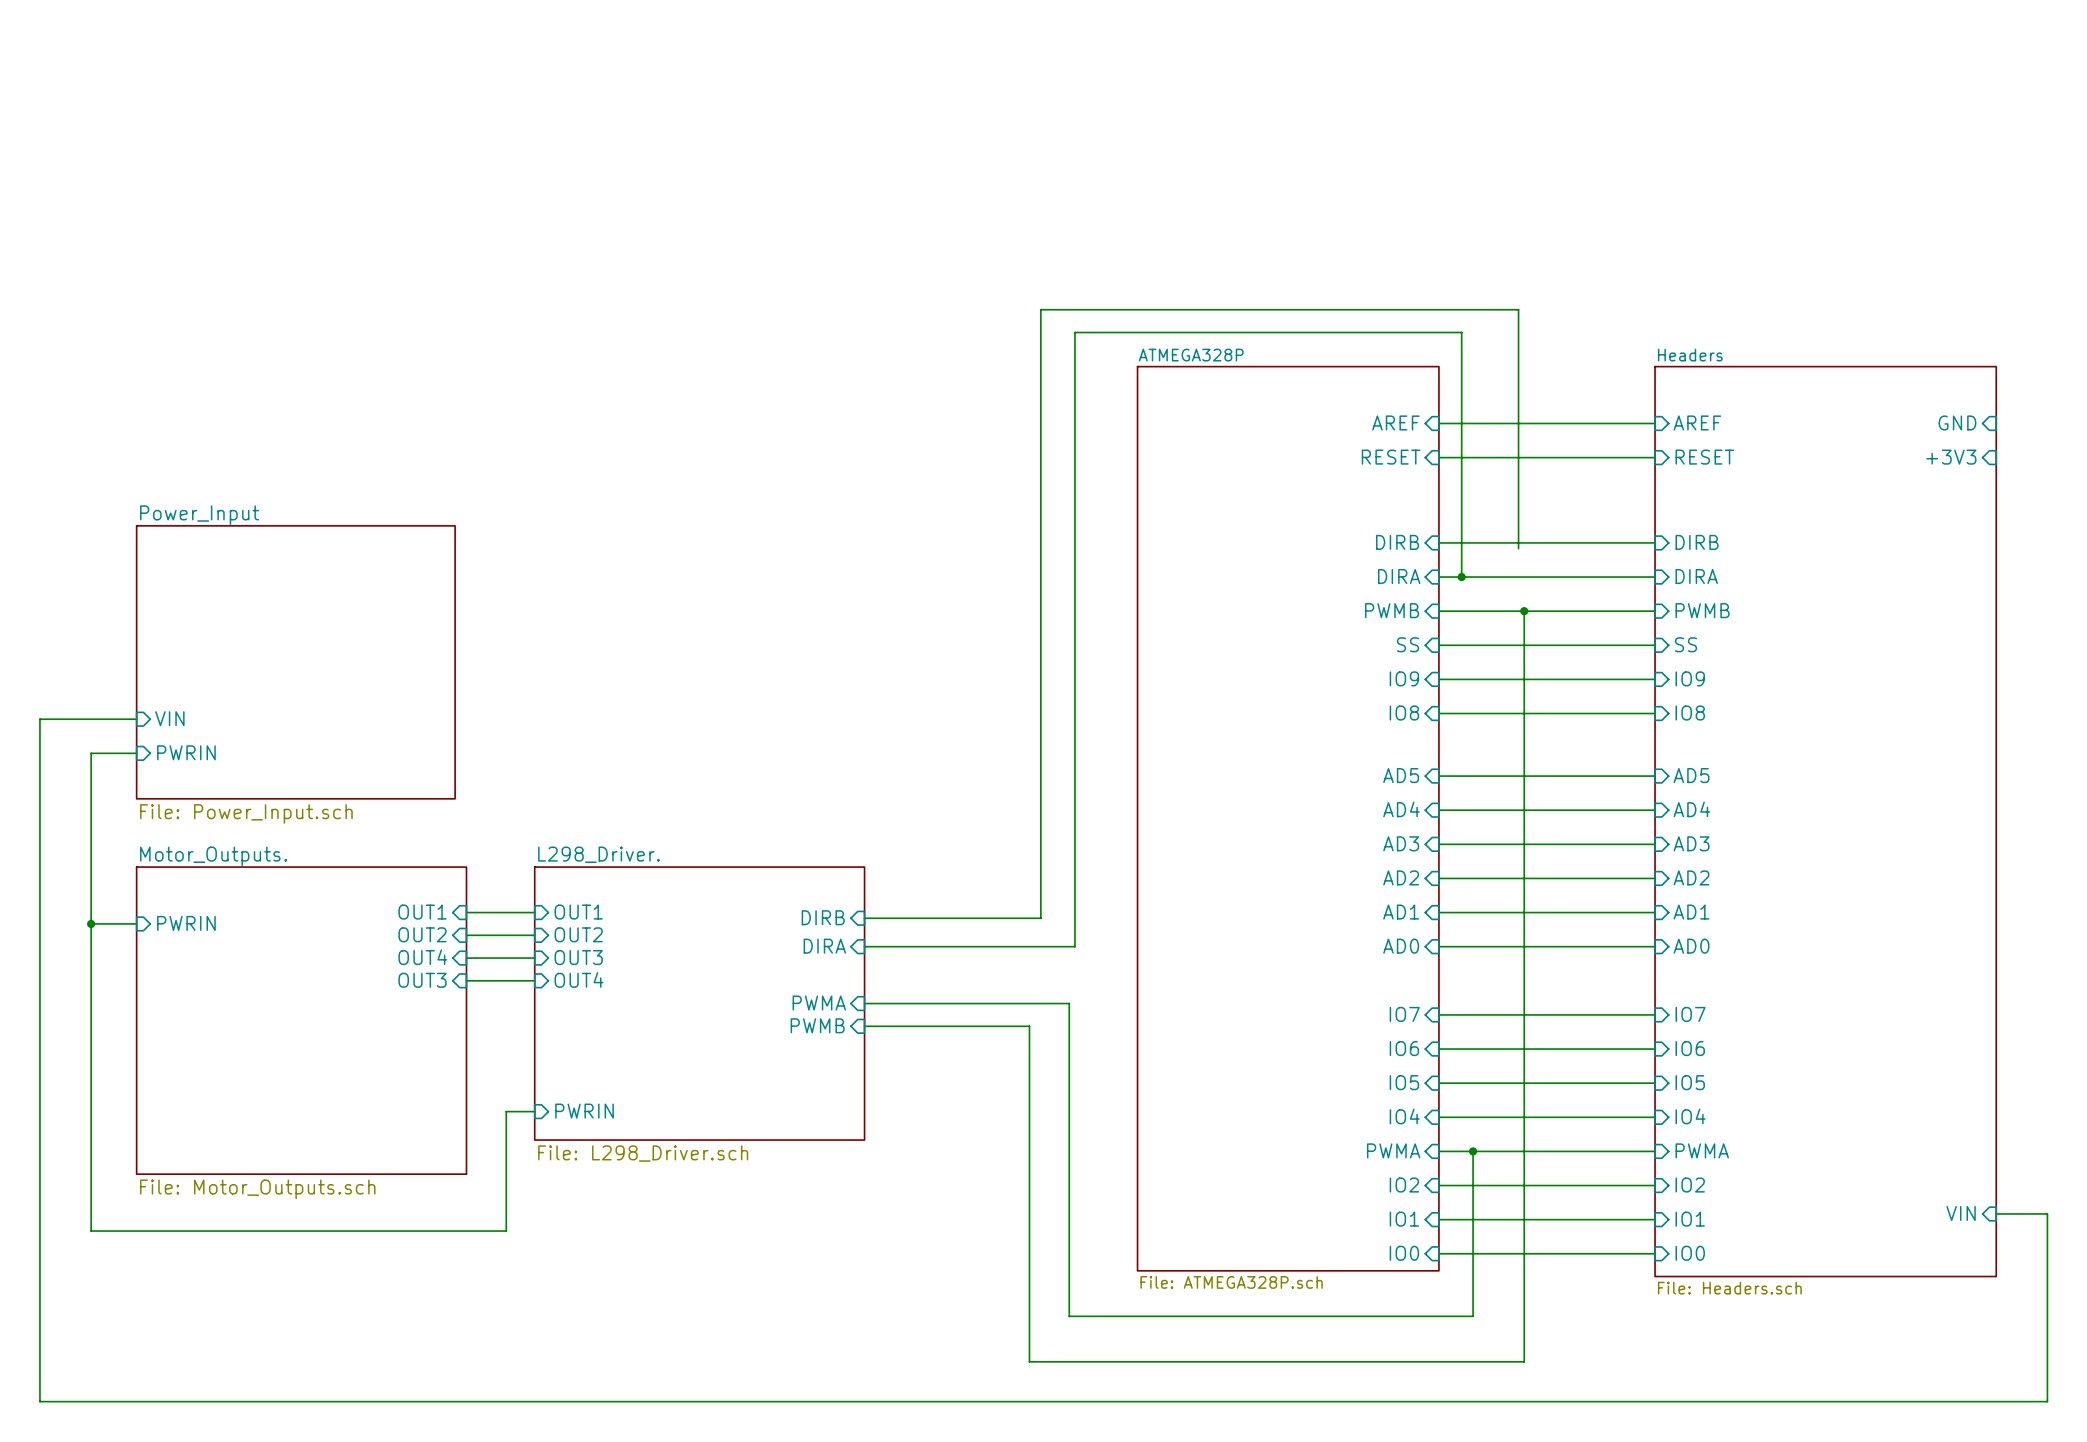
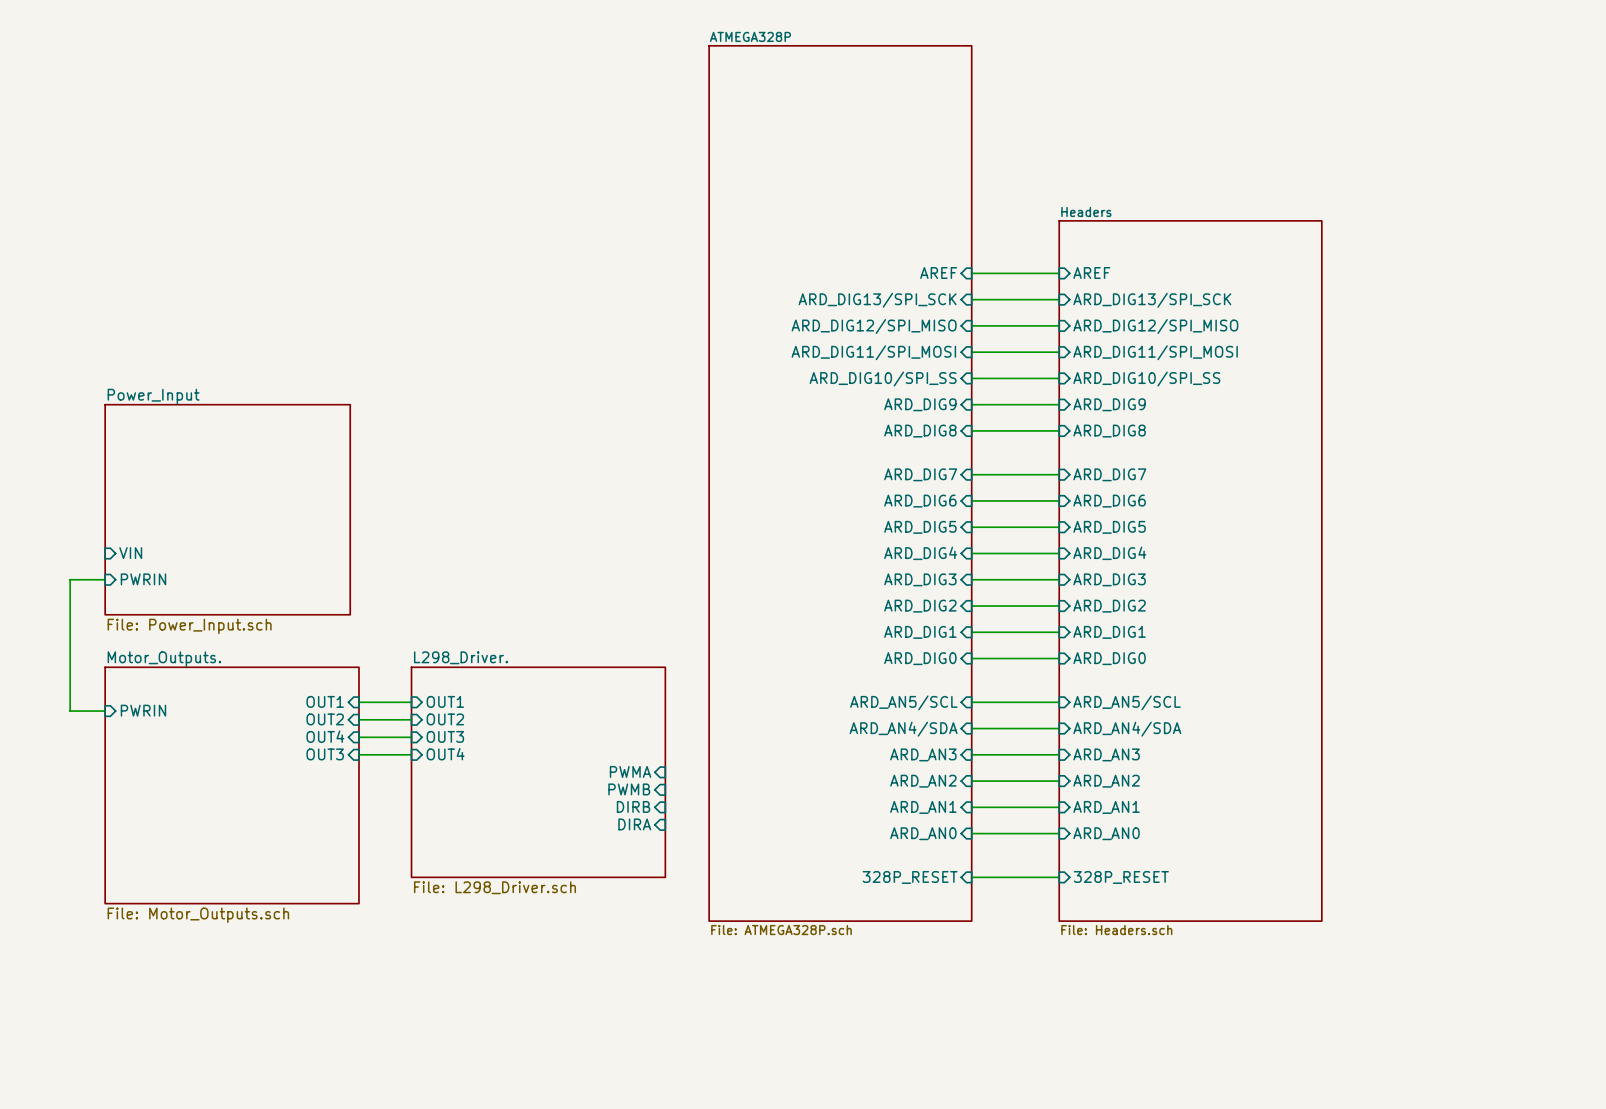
sheet pin: none -> AREF (938, 273)
sheet ATMEGA328P name position: ATMEGA328P (1191, 355) -> ATMEGA328P (750, 36)
wire: none -> (971, 273) (1059, 273)
sheet ATMEGA328P shape: [1137, 366, 1439, 1271] -> [709, 45, 972, 922]
wire: none -> (971, 299) (1059, 299)
sheet pin: none -> ARD_DIG13/SPI_SCK (877, 300)
sheet pin: none -> ARD_DIG13/SPI_SCK (1152, 300)
sheet pin rotation: 0° (1395, 422) -> 180° (1091, 273)
sheet pin position: AREF (1395, 422) -> AREF (1091, 273)
sheet pin: AREF (1697, 422) -> none
sheet pin: GND (1957, 422) -> none
wire: none -> (971, 325) (1059, 325)
wire: (1438, 423) (1655, 423) -> none
sheet pin: none -> ARD_DIG12/SPI_MISO (874, 326)
sheet pin: none -> ARD_DIG12/SPI_MISO (1155, 326)
wire: none -> (971, 352) (1059, 352)
sheet pin: RESET (1391, 457) -> none
wire: (1438, 457) (1655, 457) -> none
sheet pin: RESET (1704, 457) -> none
sheet pin: +3V3 (1951, 457) -> none
sheet pin: none -> ARD_DIG11/SPI_MOSI (873, 352)
sheet pin: none -> ARD_DIG11/SPI_MOSI (1155, 352)
wire: none -> (971, 378) (1059, 378)
sheet pin: none -> ARD_DIG10/SPI_SS (883, 379)
sheet pin: none -> ARD_DIG10/SPI_SS (1146, 379)
wire: none -> (971, 404) (1059, 404)
sheet pin: none -> ARD_DIG9 (920, 404)
sheet pin: none -> ARD_DIG9 (1109, 404)
sheet pin: DIRB (1397, 542) -> none
wire: (1438, 542) (1655, 542) -> none
sheet pin: DIRB (1697, 542) -> none
wire: (1518, 548) (1518, 309) (1040, 309) (1040, 918) (864, 918) -> none
wire: none -> (971, 430) (1059, 430)
sheet pin: none -> ARD_DIG8 (920, 431)
sheet pin: none -> ARD_DIG8 (1109, 431)
sheet pin: DIRA (1399, 576) -> none
sheet pin: DIRA (1696, 576) -> none
wire: (1438, 577) (1655, 577) -> none
wire: (1461, 577) (1461, 332) (1074, 332) (1074, 946) (864, 946) -> none
junction: (1461, 577) -> none
sheet pin: PWMB (1392, 610) -> none
sheet pin: PWMB (1702, 610) -> none
wire: (1438, 611) (1655, 611) -> none
wire: (1524, 611) (1524, 1361) (1029, 1361) (1029, 1026) (864, 1026) -> none
junction: (1524, 611) -> none
sheet pin: none -> ARD_DIG7 (920, 474)
wire: none -> (971, 474) (1059, 474)
sheet pin: none -> ARD_DIG7 (1109, 474)
sheet pin: SS (1407, 644) -> none
sheet pin: SS (1685, 644) -> none
wire: (1438, 645) (1655, 645) -> none
wire: none -> (971, 500) (1059, 500)
sheet pin: none -> ARD_DIG6 (920, 501)
sheet pin: none -> ARD_DIG6 (1109, 501)
sheet pin: IO9 (1404, 678) -> none
sheet pin: IO9 (1690, 678) -> none
wire: (1438, 679) (1655, 679) -> none
sheet pin: none -> ARD_DIG5 (920, 527)
wire: none -> (971, 527) (1059, 527)
sheet pin: none -> ARD_DIG5 (1109, 527)
sheet pin: IO8 (1404, 713) -> none
wire: (1438, 713) (1655, 713) -> none
sheet pin: IO8 (1690, 713) -> none
wire: (136, 719) (39, 719) (39, 1401) (2047, 1401) (2047, 1213) (1996, 1213) -> none
sheet pin: none -> ARD_DIG4 (920, 553)
wire: none -> (971, 553) (1059, 553)
sheet pin: none -> ARD_DIG4 (1109, 553)
sheet Headers: none -> File: Headers.sch (1190, 571)
sheet pin: none -> ARD_DIG3 (920, 579)
wire: none -> (971, 579) (1059, 579)
sheet pin: none -> ARD_DIG3 (1109, 579)
sheet pin: AD5 (1401, 775) -> none
sheet pin: AD5 (1691, 775) -> none
wire: (1438, 776) (1655, 776) -> none
sheet pin: none -> ARD_DIG2 (920, 606)
wire: none -> (971, 606) (1059, 606)
sheet pin: none -> ARD_DIG2 (1109, 606)
sheet pin: AD4 (1401, 809) -> none
sheet pin: AD4 (1691, 809) -> none
wire: (1438, 810) (1655, 810) -> none
sheet pin: none -> ARD_DIG1 (920, 632)
wire: none -> (971, 632) (1059, 632)
sheet pin: none -> ARD_DIG1 (1109, 632)
sheet Headers: File: Headers.sch (1825, 821) -> none
sheet pin: AD3 (1401, 843) -> none
sheet pin: AD3 (1691, 843) -> none
wire: (1438, 844) (1655, 844) -> none
sheet pin: none -> ARD_DIG0 (920, 658)
wire: none -> (971, 658) (1059, 658)
sheet pin: none -> ARD_DIG0 (1109, 658)
sheet pin: AD2 (1401, 877) -> none
sheet pin: AD2 (1691, 877) -> none
wire: (1438, 878) (1655, 878) -> none
wire: none -> (971, 702) (1059, 702)
sheet pin: AD1 (1401, 912) -> none
wire: (1438, 912) (1655, 912) -> none
sheet pin: AD1 (1691, 912) -> none
sheet pin: none -> ARD_AN5/SCL (903, 702)
sheet pin: none -> ARD_AN5/SCL (1127, 702)
sheet pin position: DIRB (823, 917) -> DIRB (633, 806)
wire: (91, 923) (91, 1231) (506, 1231) (506, 1111) (534, 1111) -> none
junction: (91, 923) -> none
sheet pin position: DIRA (824, 946) -> DIRA (634, 824)
wire: none -> (971, 728) (1059, 728)
sheet pin: AD0 (1401, 946) -> none
wire: (1438, 946) (1655, 946) -> none
sheet pin: AD0 (1691, 946) -> none
sheet pin: none -> ARD_AN4/SDA (903, 729)
sheet pin: none -> ARD_AN4/SDA (1127, 729)
sheet pin: none -> ARD_AN3 (923, 754)
wire: none -> (971, 754) (1059, 754)
sheet pin: none -> ARD_AN3 (1106, 754)
wire: (864, 1003) (1069, 1003) (1069, 1316) (1473, 1316) (1473, 1151) -> none
wire: none -> (971, 781) (1059, 781)
sheet pin: IO7 (1404, 1014) -> none
wire: (1438, 1014) (1655, 1014) -> none
sheet pin: IO7 (1690, 1014) -> none
sheet pin: none -> ARD_AN2 (923, 781)
sheet pin: none -> ARD_AN2 (1106, 781)
sheet pin: IO6 (1404, 1048) -> none
sheet pin: IO6 (1690, 1048) -> none
sheet pin: none -> ARD_AN1 (923, 807)
wire: none -> (971, 807) (1059, 807)
sheet pin: none -> ARD_AN1 (1106, 807)
wire: (1438, 1049) (1655, 1049) -> none
sheet pin: IO5 (1404, 1082) -> none
sheet pin: IO5 (1690, 1082) -> none
sheet pin: none -> ARD_AN0 (923, 833)
wire: none -> (971, 833) (1059, 833)
sheet pin: none -> ARD_AN0 (1106, 833)
wire: (1438, 1083) (1655, 1083) -> none
sheet pin: PWRIN (584, 1111) -> none
sheet pin: IO4 (1404, 1116) -> none
sheet pin: IO4 (1690, 1116) -> none
wire: (1438, 1117) (1655, 1117) -> none
sheet pin: none -> 328P_RESET (910, 877)
wire: none -> (971, 877) (1059, 877)
sheet pin: none -> 328P_RESET (1121, 877)
sheet pin: PWMA (1393, 1150) -> none
sheet pin: PWMA (1702, 1150) -> none
wire: (1438, 1151) (1655, 1151) -> none
junction: (1473, 1151) -> none
sheet pin: IO2 (1404, 1185) -> none
wire: (1438, 1185) (1655, 1185) -> none
sheet pin: IO2 (1690, 1185) -> none
sheet pin: VIN (1961, 1213) -> none
sheet pin: IO1 (1404, 1219) -> none
wire: (1438, 1219) (1655, 1219) -> none
sheet pin: IO1 (1690, 1219) -> none
sheet pin: IO0 (1404, 1253) -> none
wire: (1438, 1253) (1655, 1253) -> none
sheet pin: IO0 (1690, 1253) -> none
sheet ATMEGA328P value position: File: ATMEGA328P.sch (1231, 1282) -> File: ATMEGA328P.sch (781, 930)

